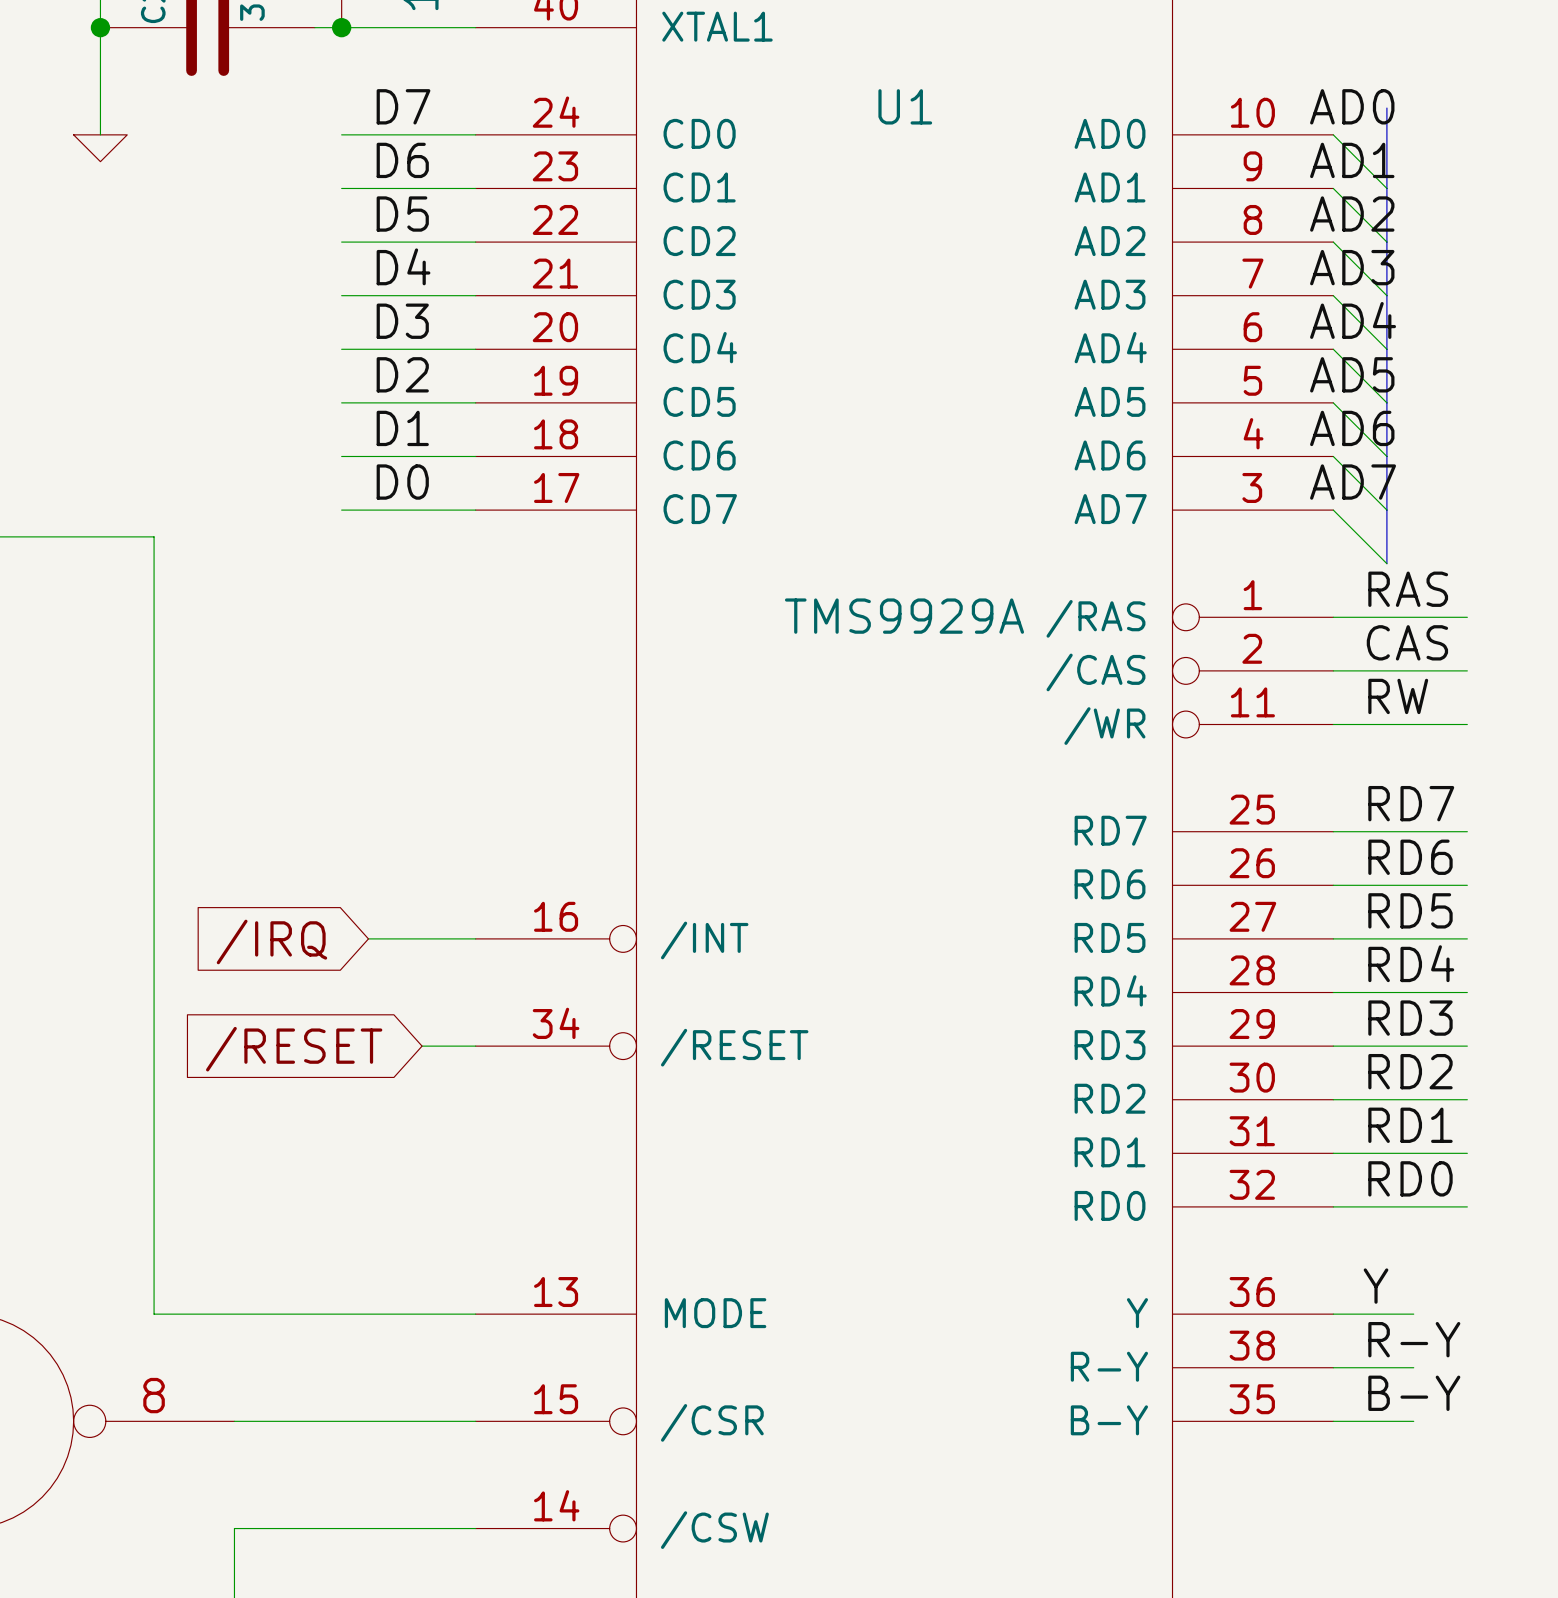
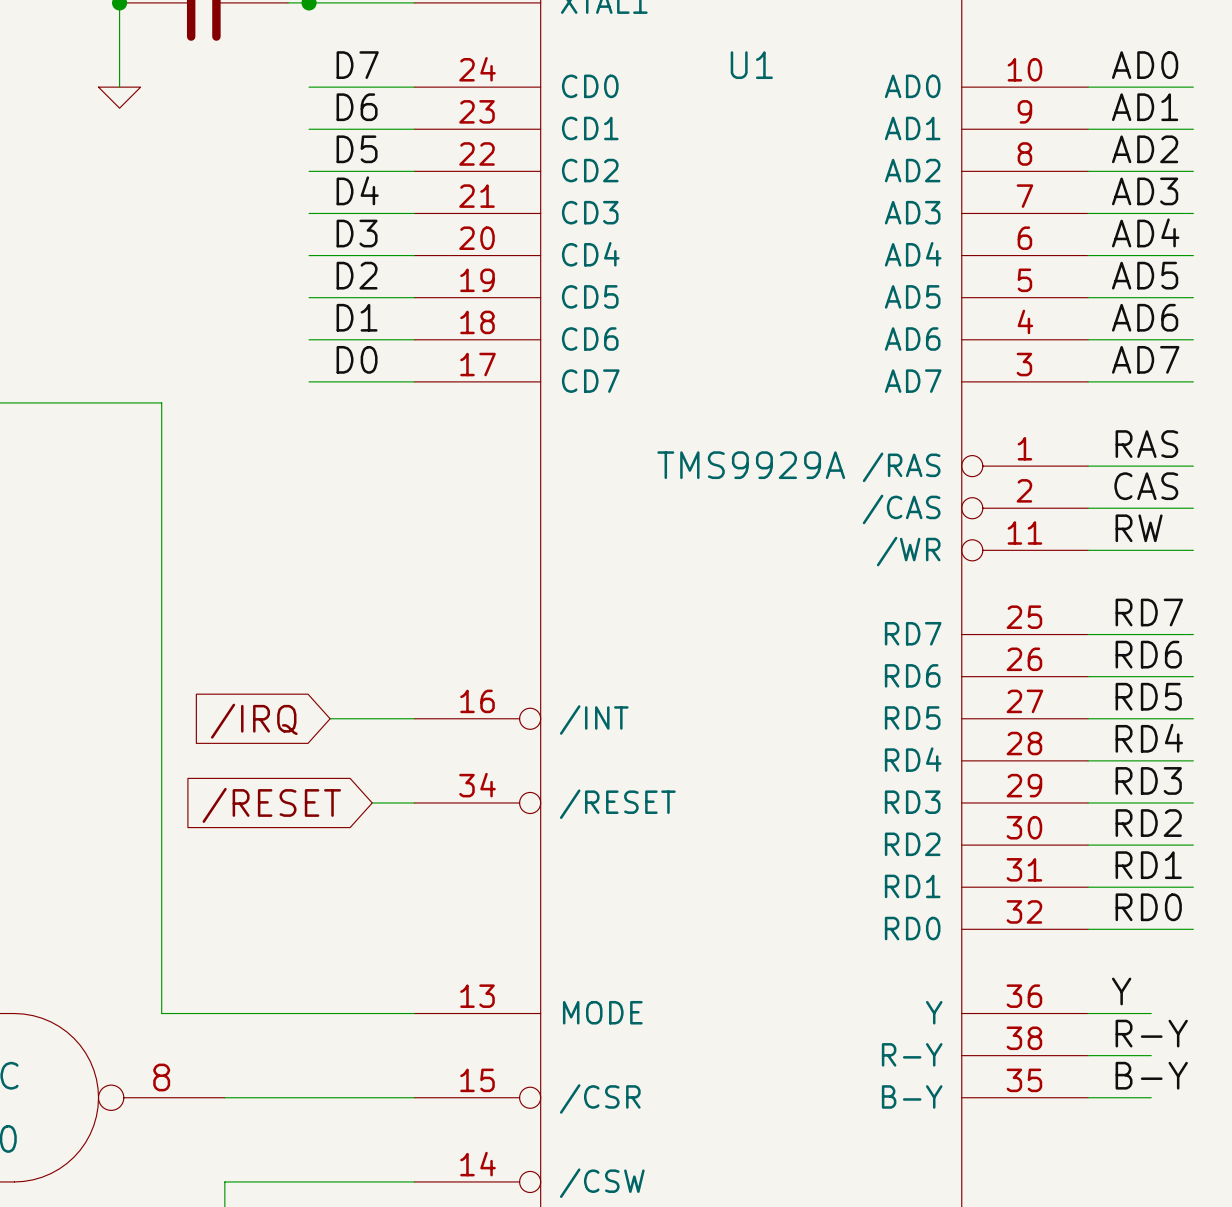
label position: AD0 (1352, 106) -> AD0 (1145, 65)
bus: (1386, 108) (1386, 563) -> none
wire: (1333, 134) (1386, 188) -> (1088, 87) (1193, 87)
label position: AD1 (1352, 160) -> AD1 (1145, 107)
wire: (1333, 188) (1386, 242) -> (1088, 129) (1193, 129)
label position: AD2 (1352, 214) -> AD2 (1145, 149)
wire: (1333, 242) (1386, 295) -> (1088, 171) (1193, 171)
label position: AD3 (1352, 267) -> AD3 (1145, 191)
wire: (1333, 295) (1386, 349) -> (1088, 213) (1193, 213)
label position: AD4 (1353, 320) -> AD4 (1145, 232)
wire: (1333, 349) (1386, 402) -> (1088, 255) (1193, 255)
label position: AD5 (1352, 374) -> AD5 (1145, 275)
wire: (1333, 402) (1386, 456) -> (1088, 297) (1193, 297)
label position: AD6 (1352, 428) -> AD6 (1145, 317)
wire: (1333, 456) (1386, 510) -> (1088, 339) (1193, 339)
label position: AD7 (1353, 482) -> AD7 (1145, 359)
wire: (1333, 510) (1386, 563) -> (1088, 381) (1193, 381)

